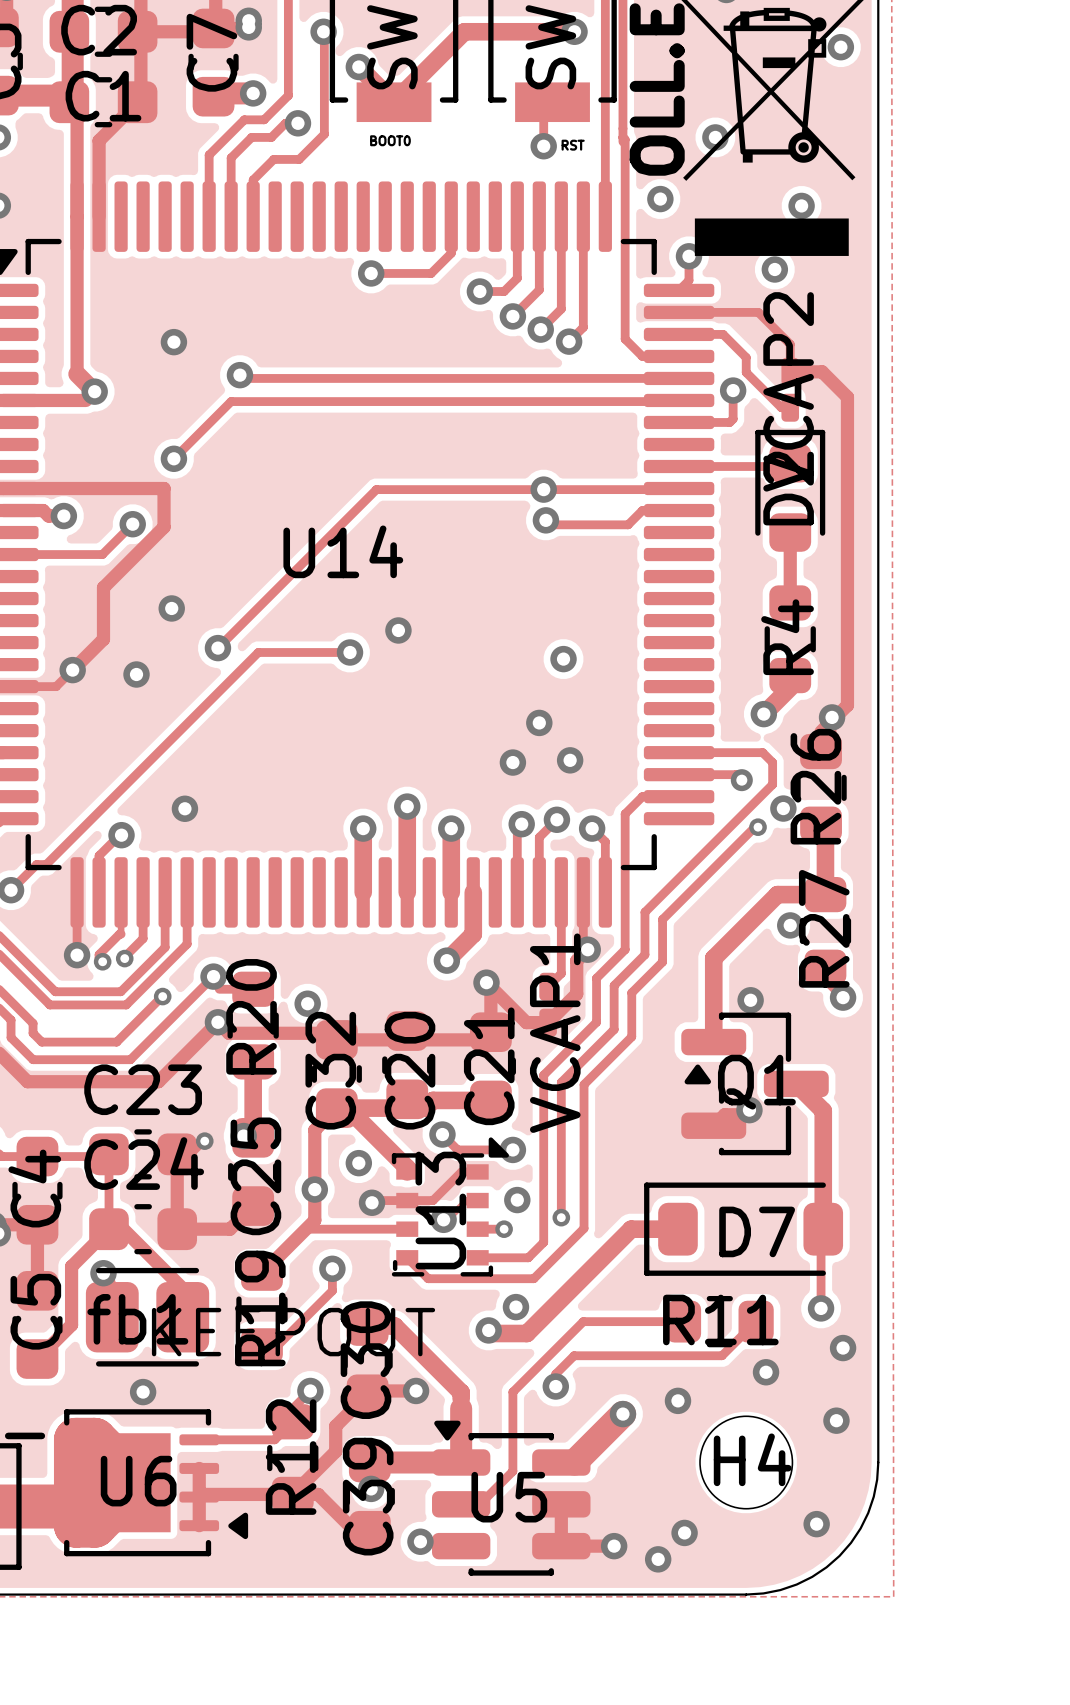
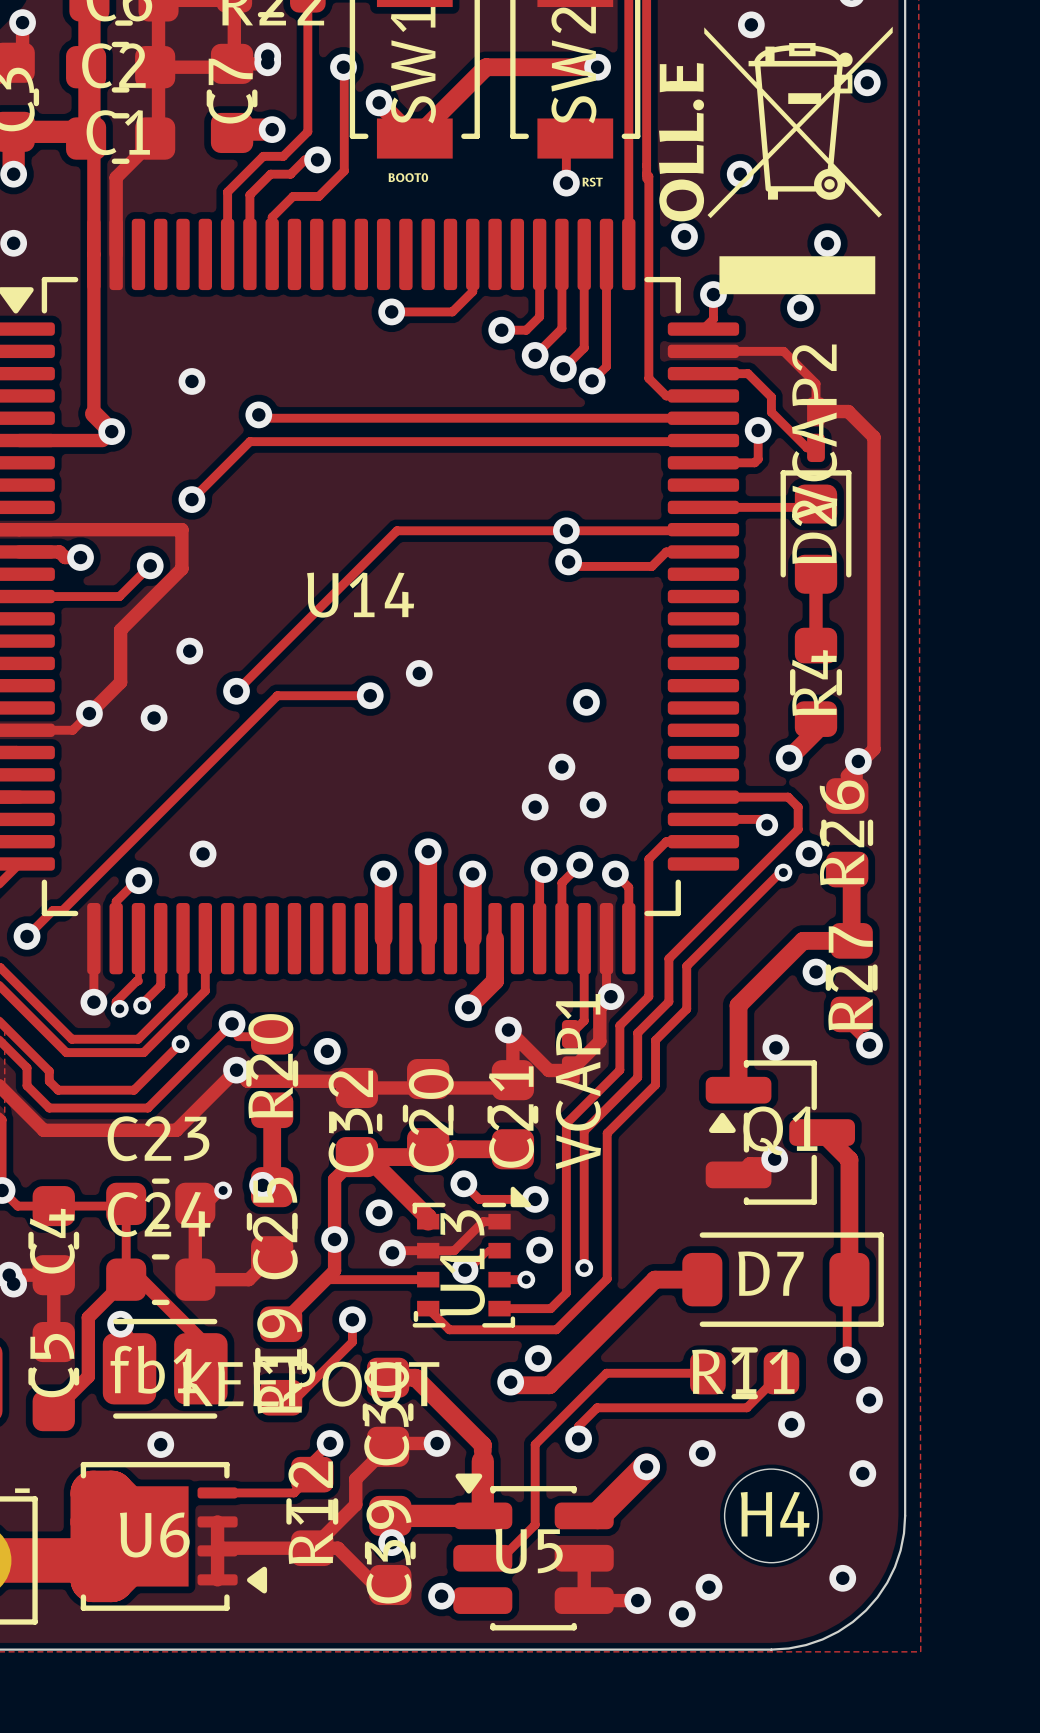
D7 rotation: 0° (743, 1229) -> 180° (783, 1279)

